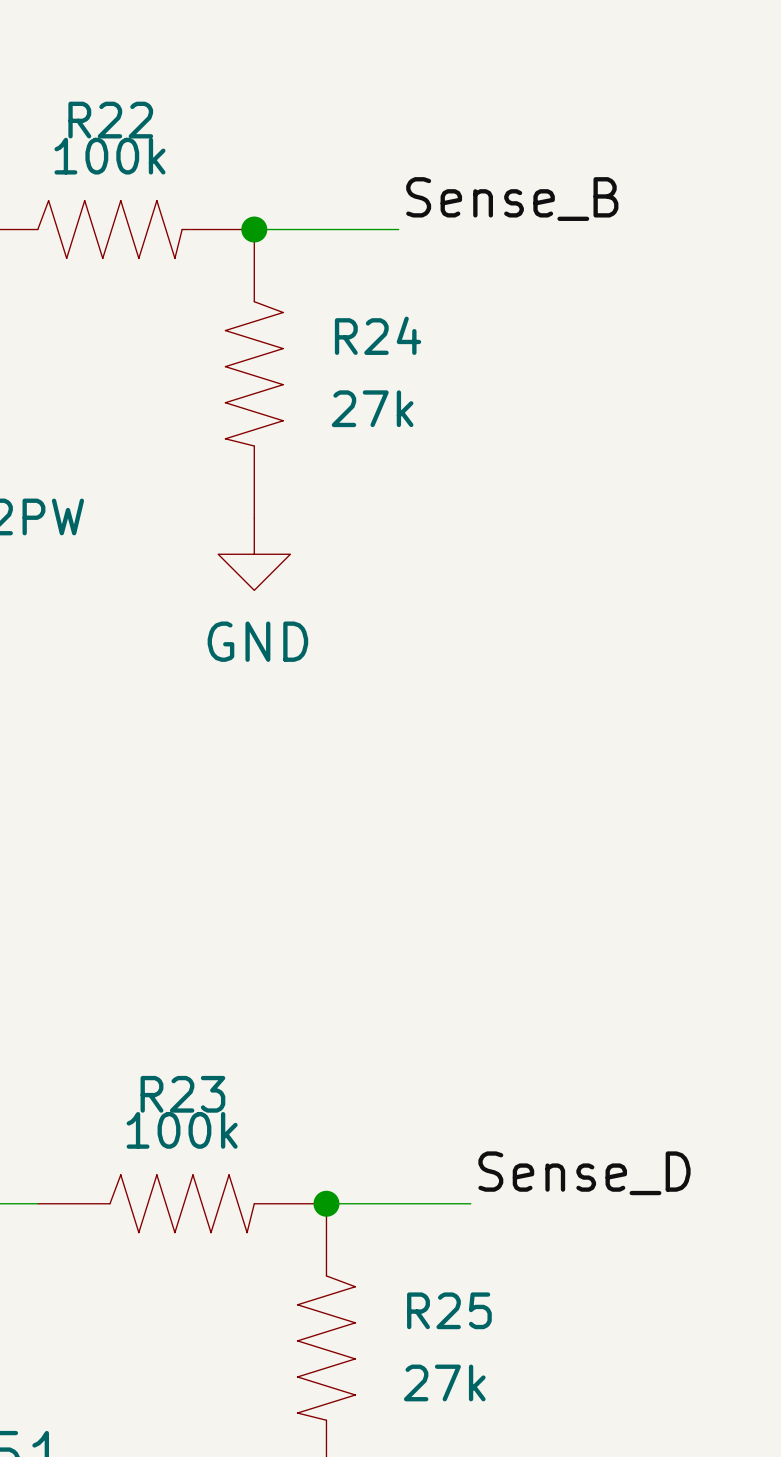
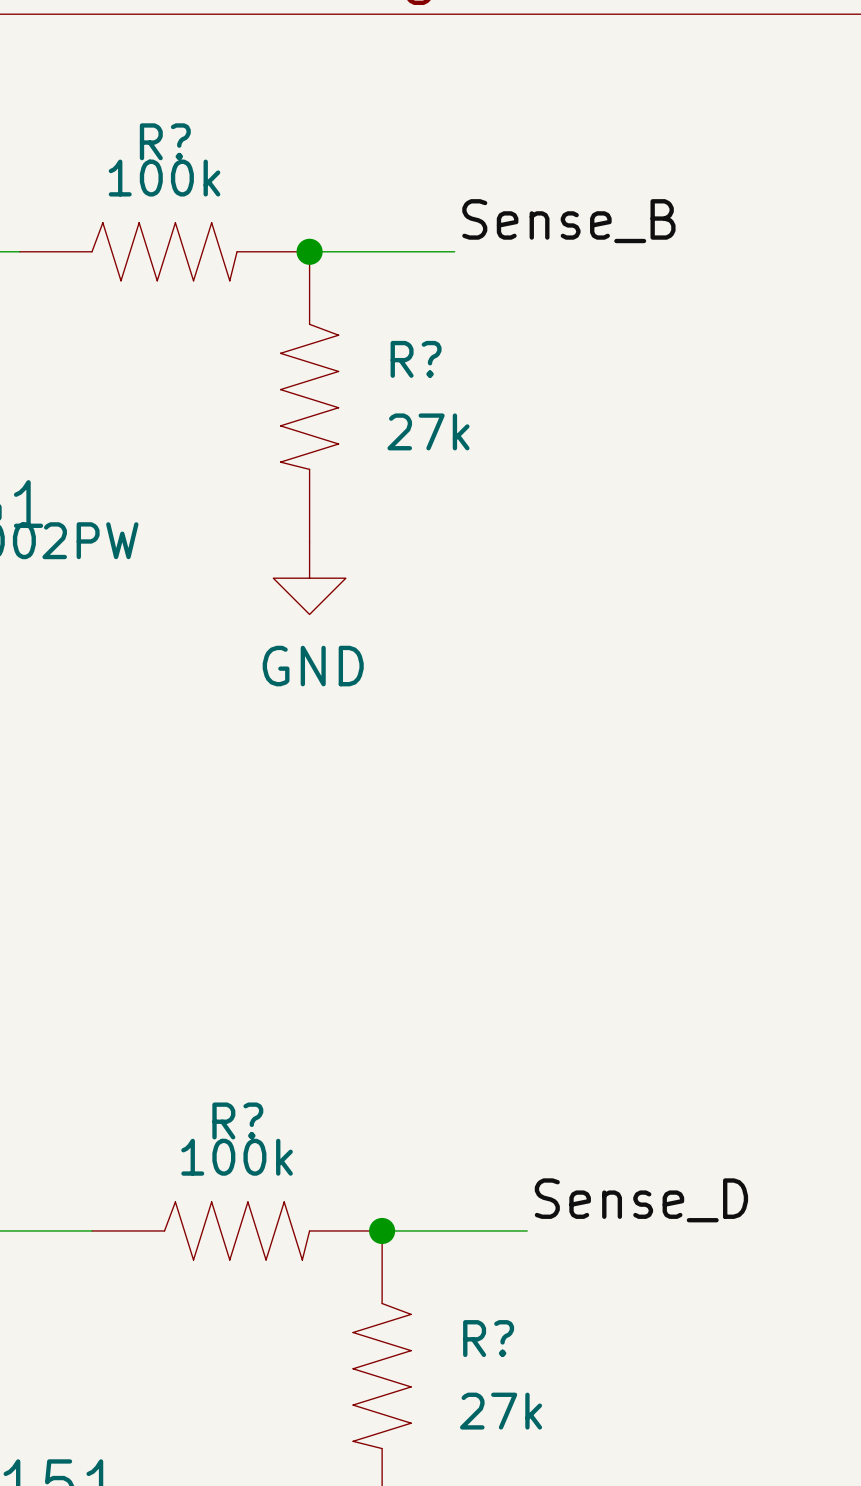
R22 name: R22 (110, 120) -> R? (165, 141)
R24 name: R24 (378, 335) -> R? (416, 359)
R23 name: R23 (182, 1094) -> R? (237, 1120)
R25 name: R25 (449, 1310) -> R? (488, 1338)

